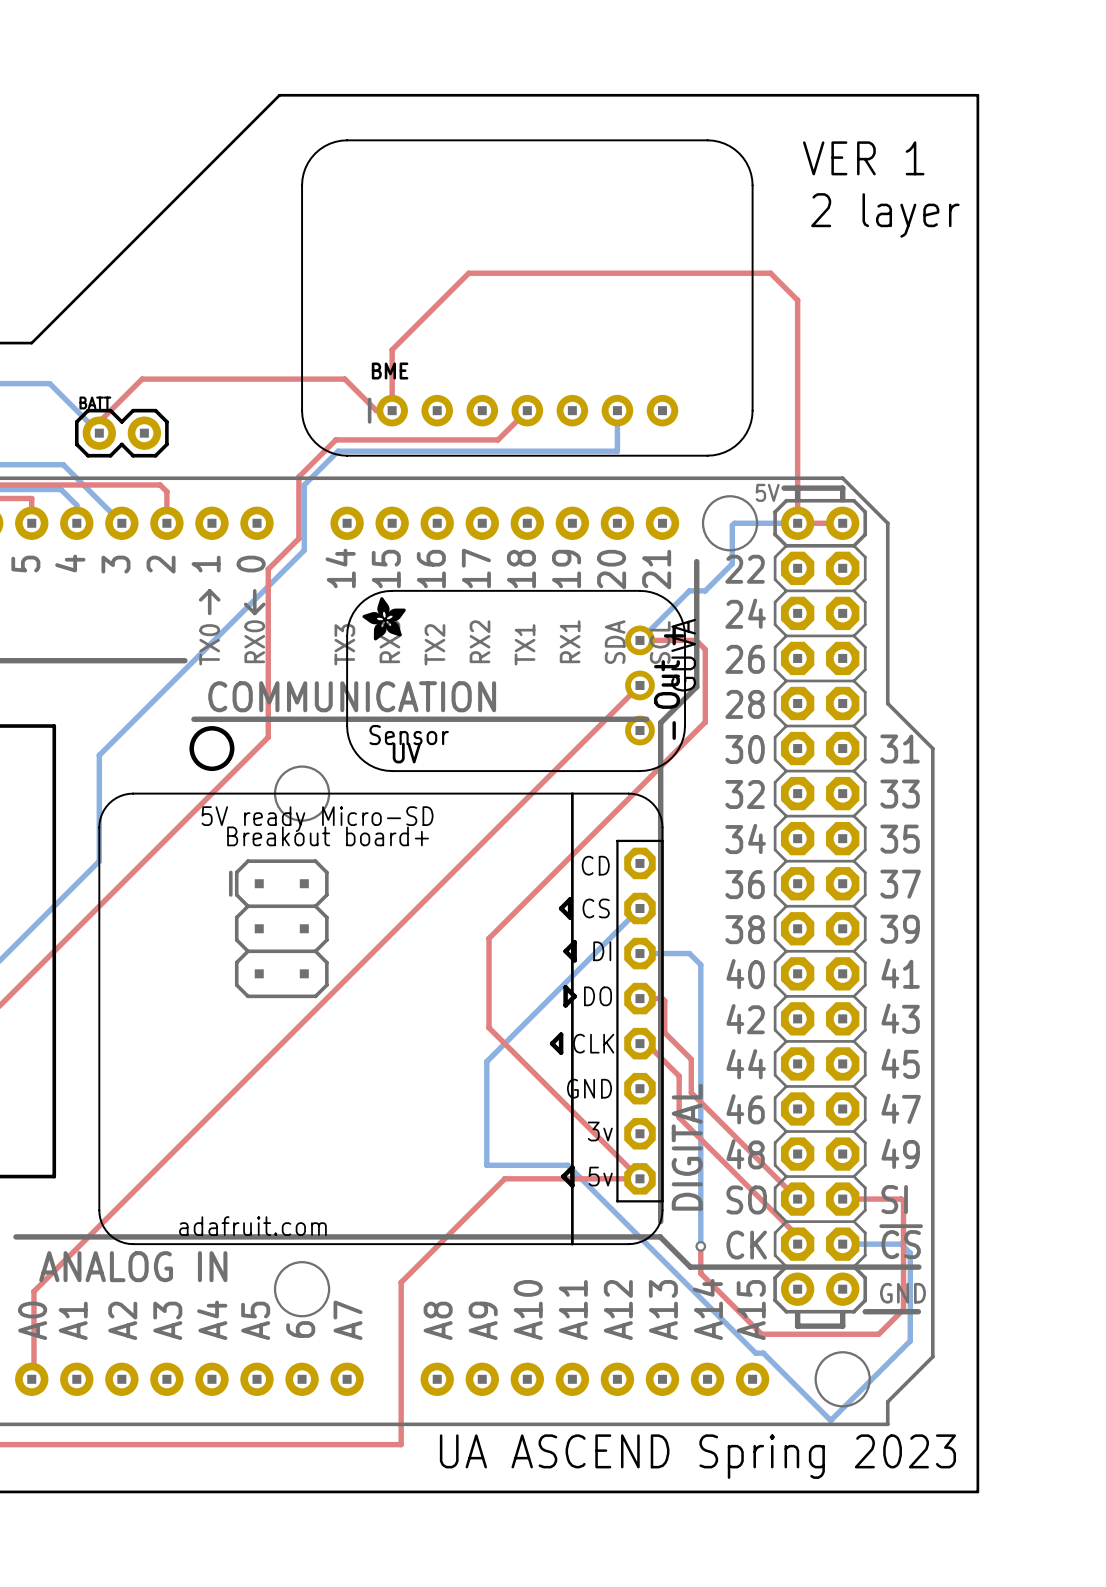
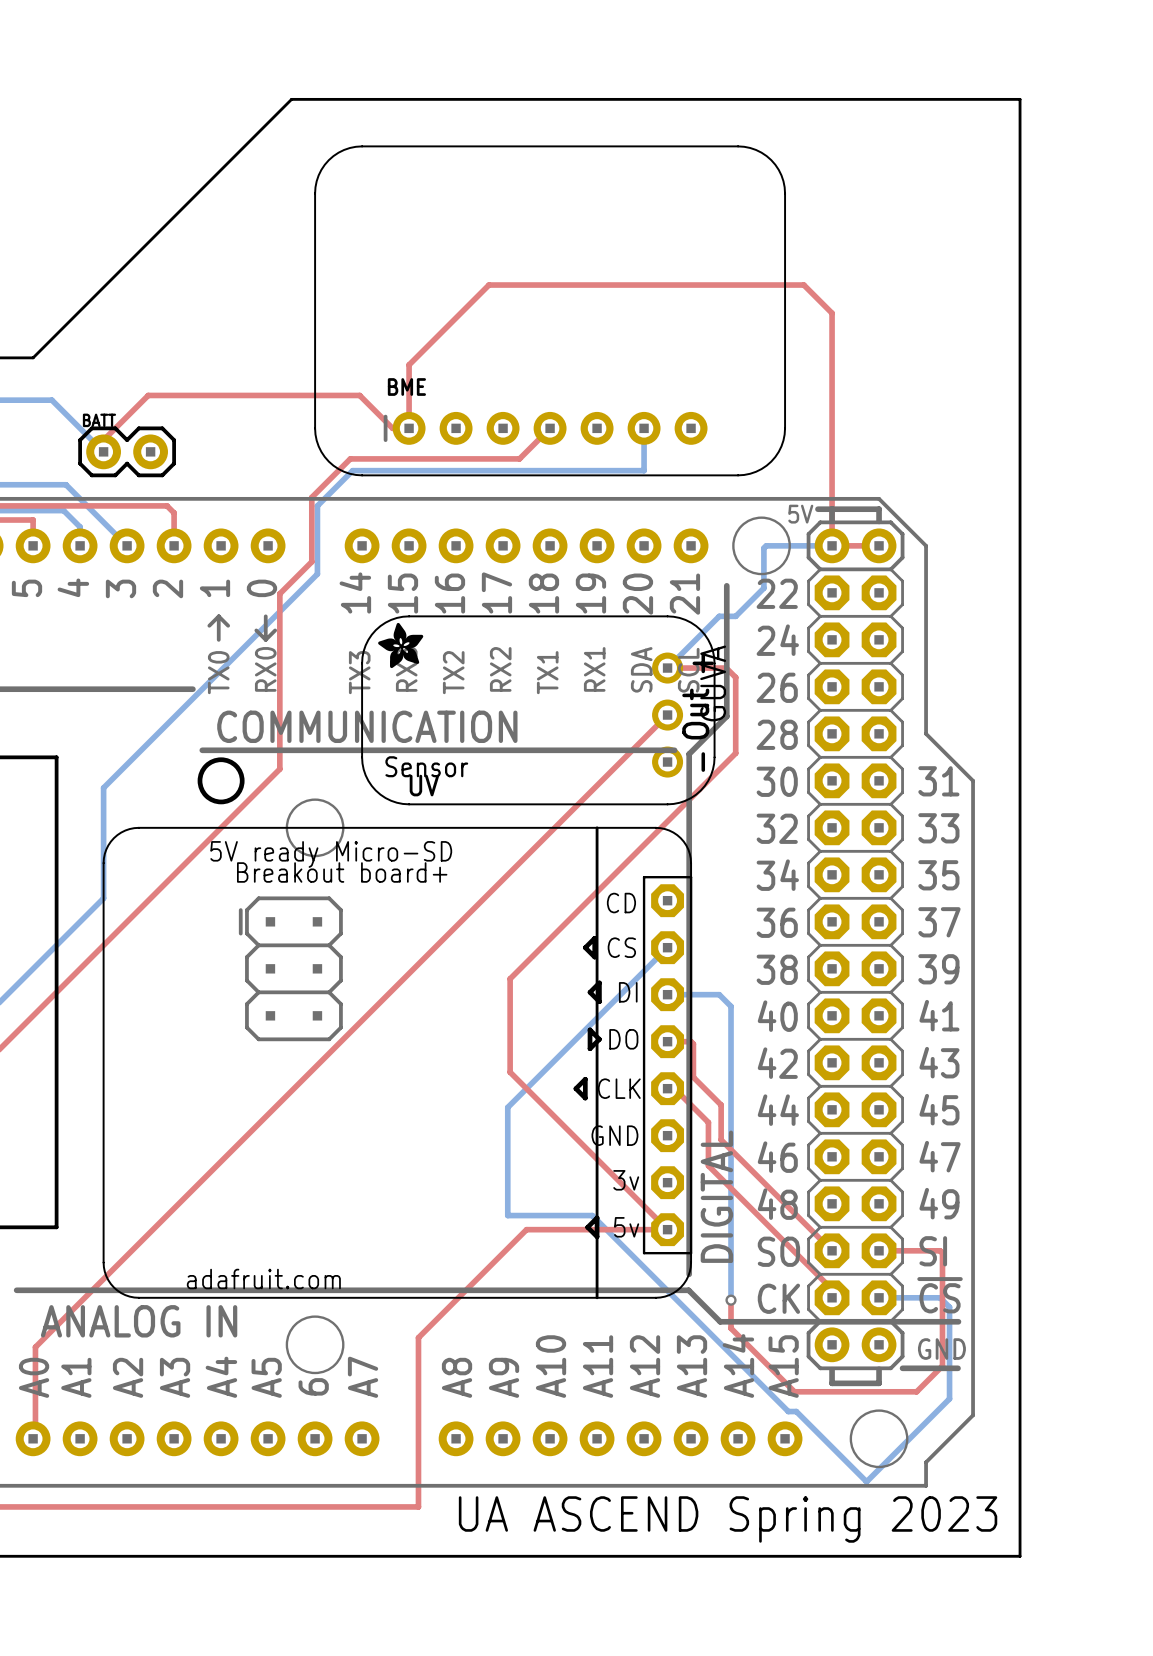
text: VER 1 (863, 158) -> none
text: 2 layer (885, 215) -> none

